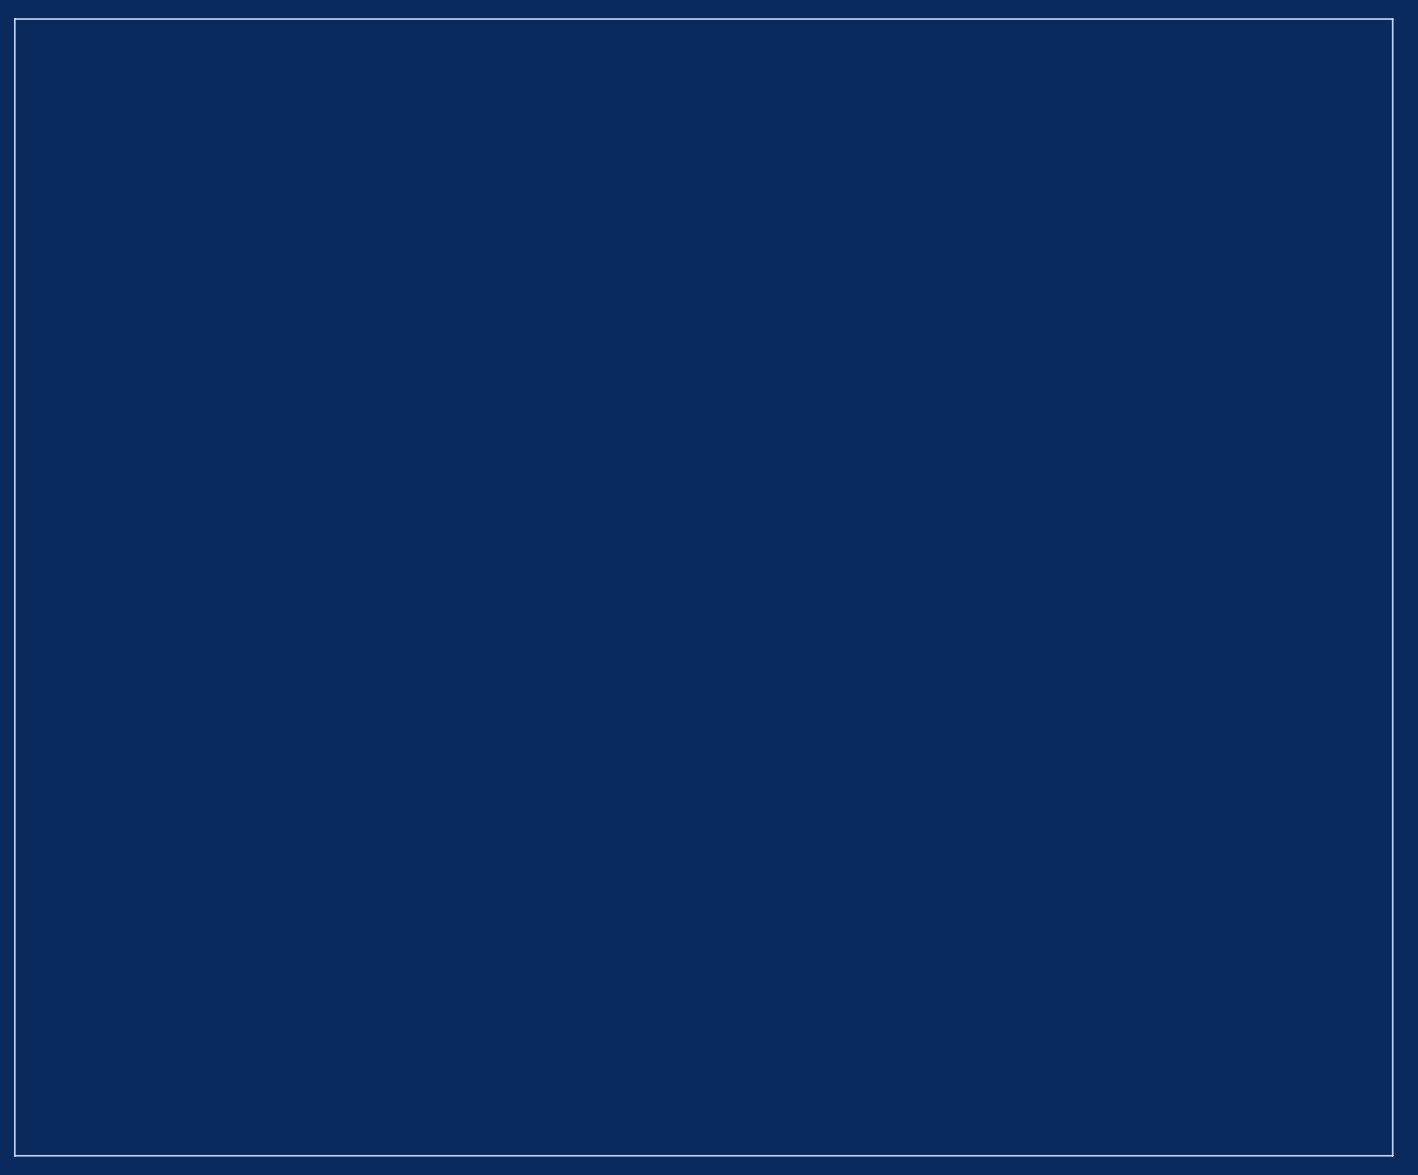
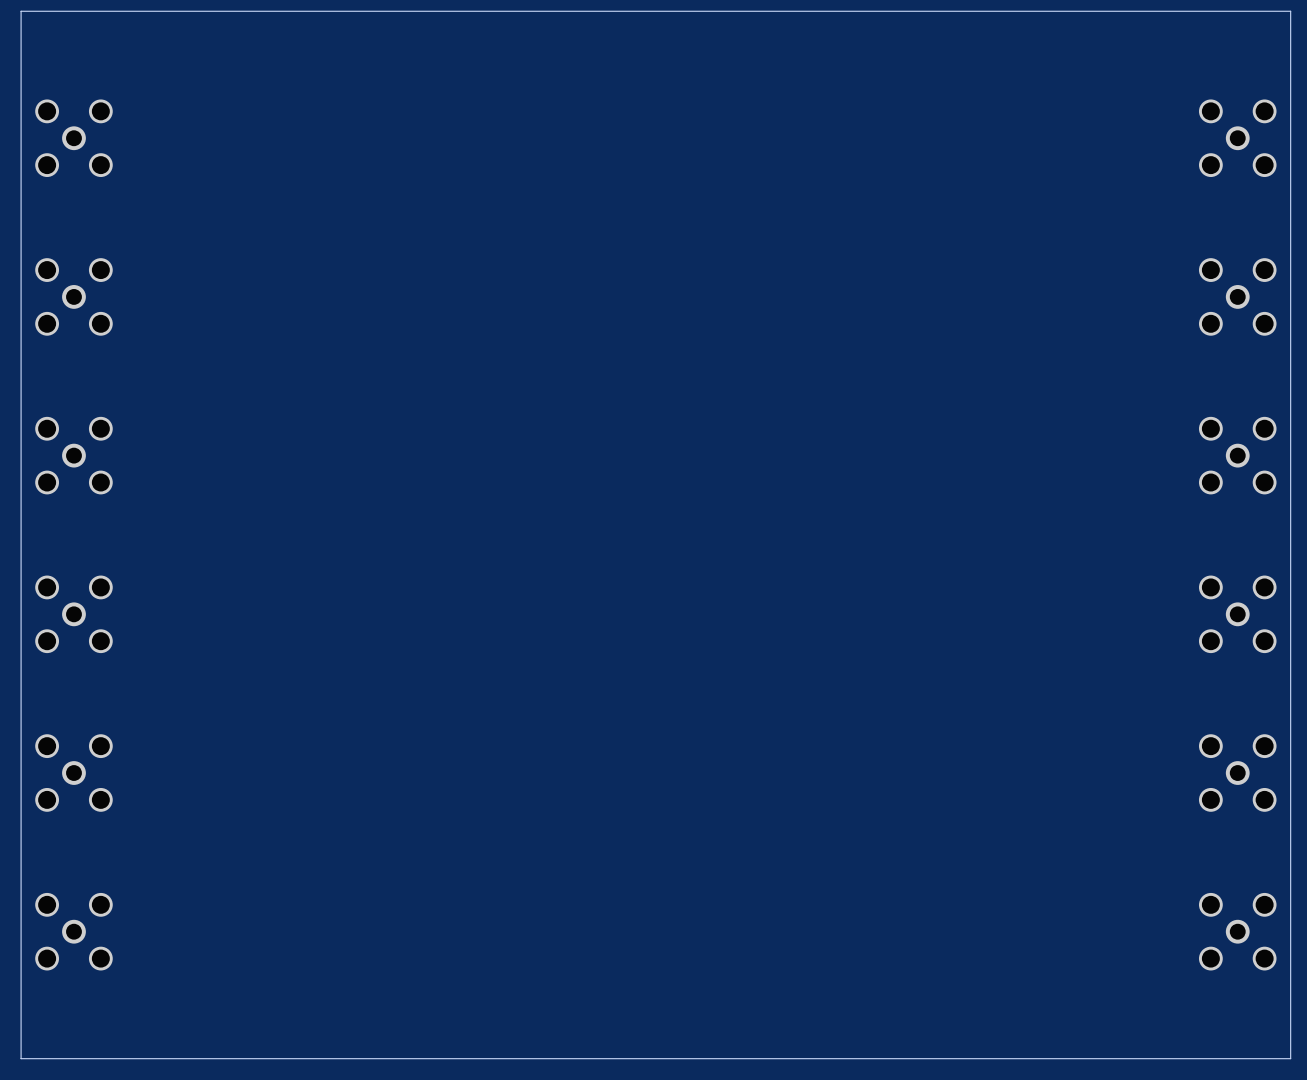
part: none -> (73, 138)
part: none -> (1237, 138)
part: none -> (73, 296)
part: none -> (1237, 296)
part: none -> (73, 455)
part: none -> (1237, 455)
part: none -> (73, 614)
part: none -> (1237, 614)
part: none -> (73, 773)
part: none -> (1237, 773)
part: none -> (73, 931)
part: none -> (1237, 931)

